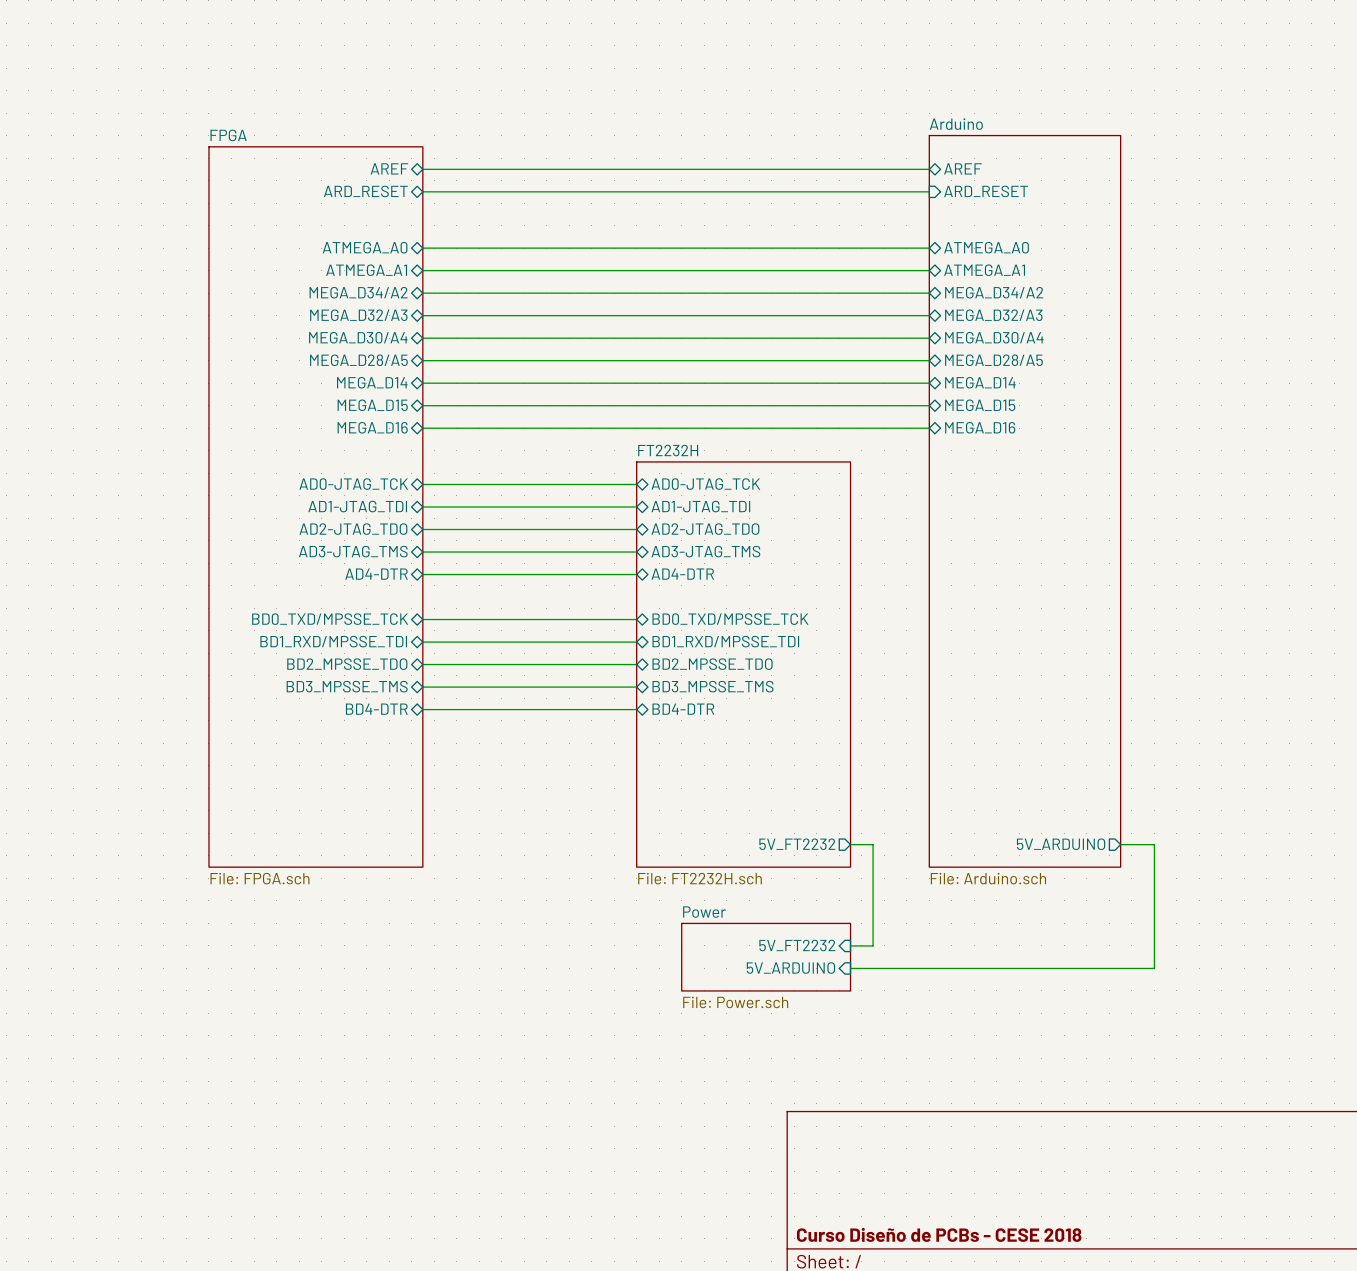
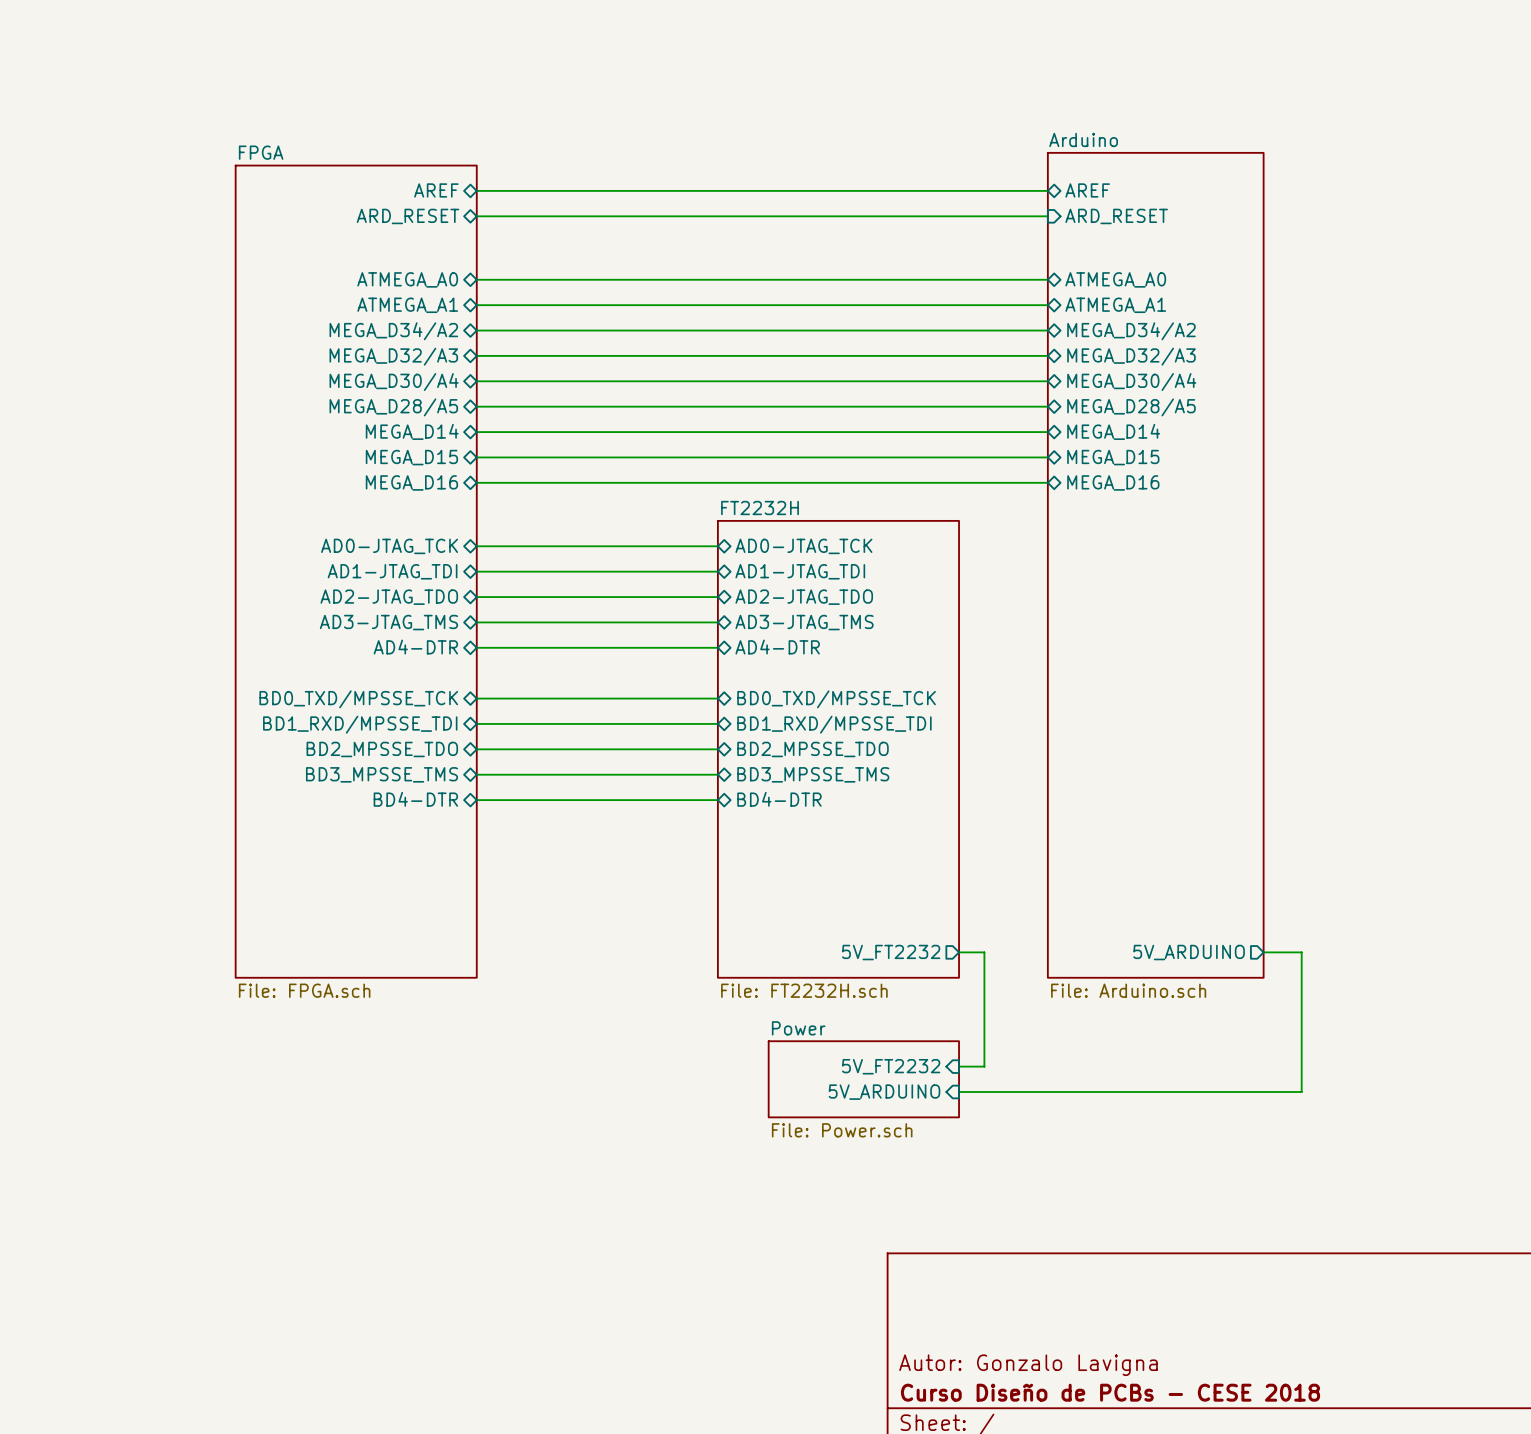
title block: none -> Autor: Gonzalo Lavigna (1028, 1365)

